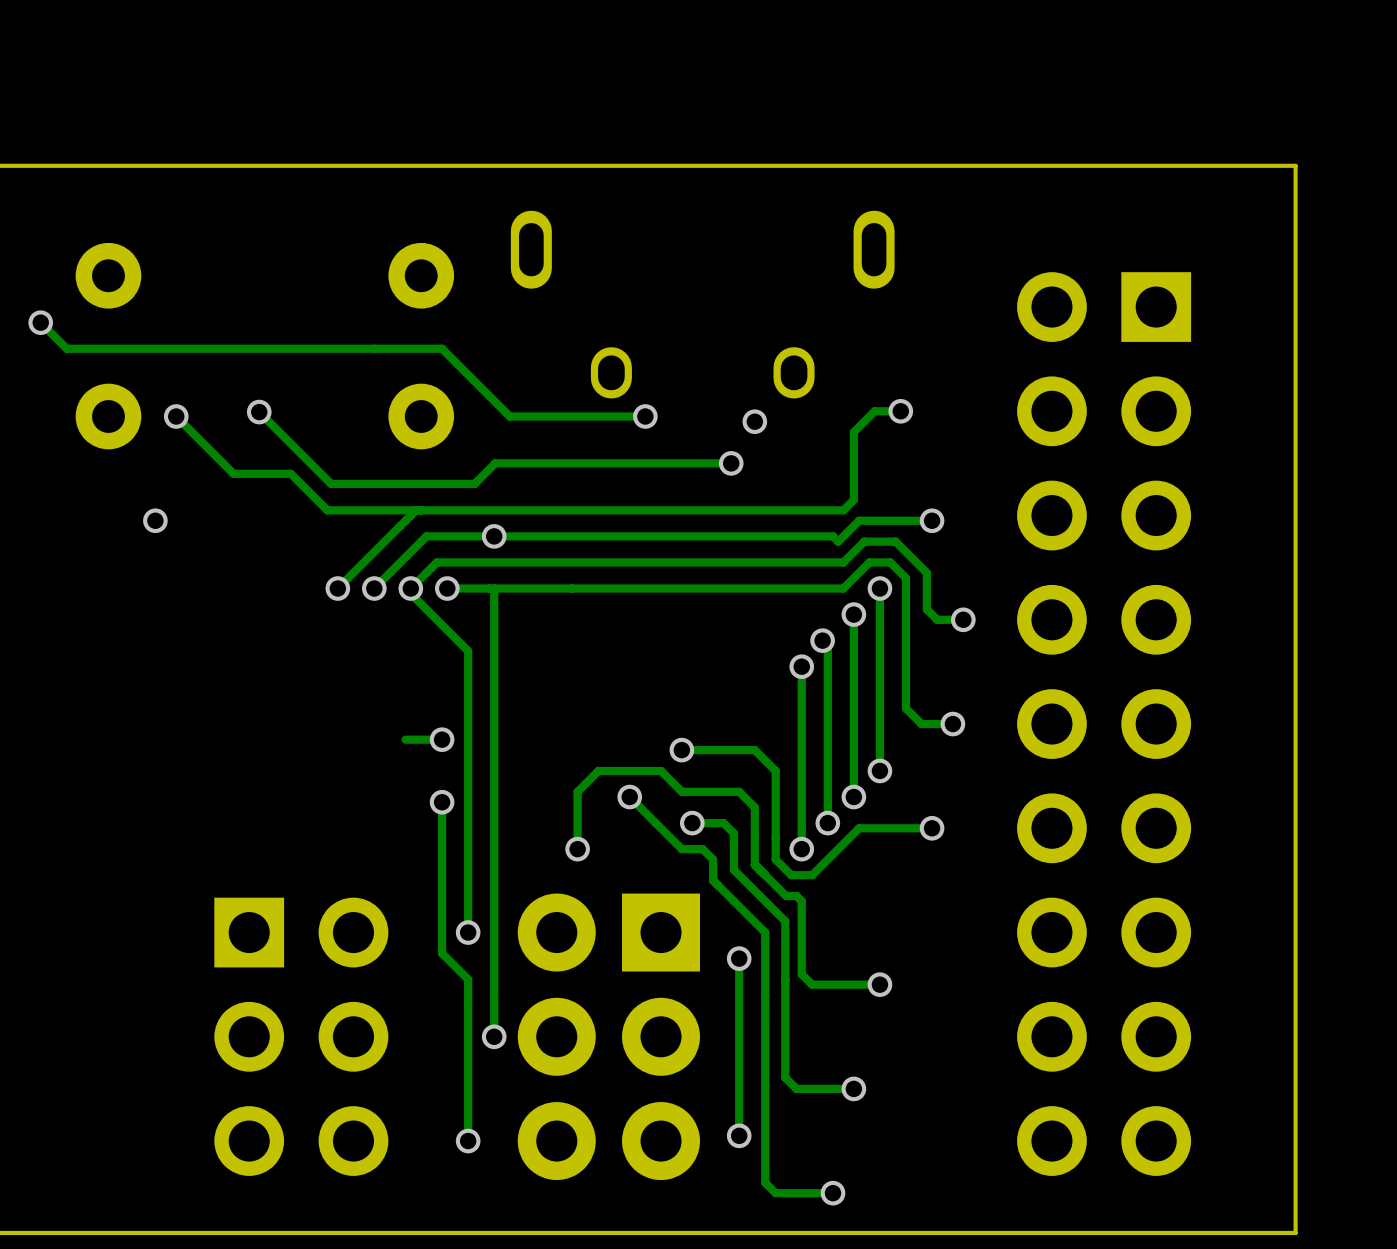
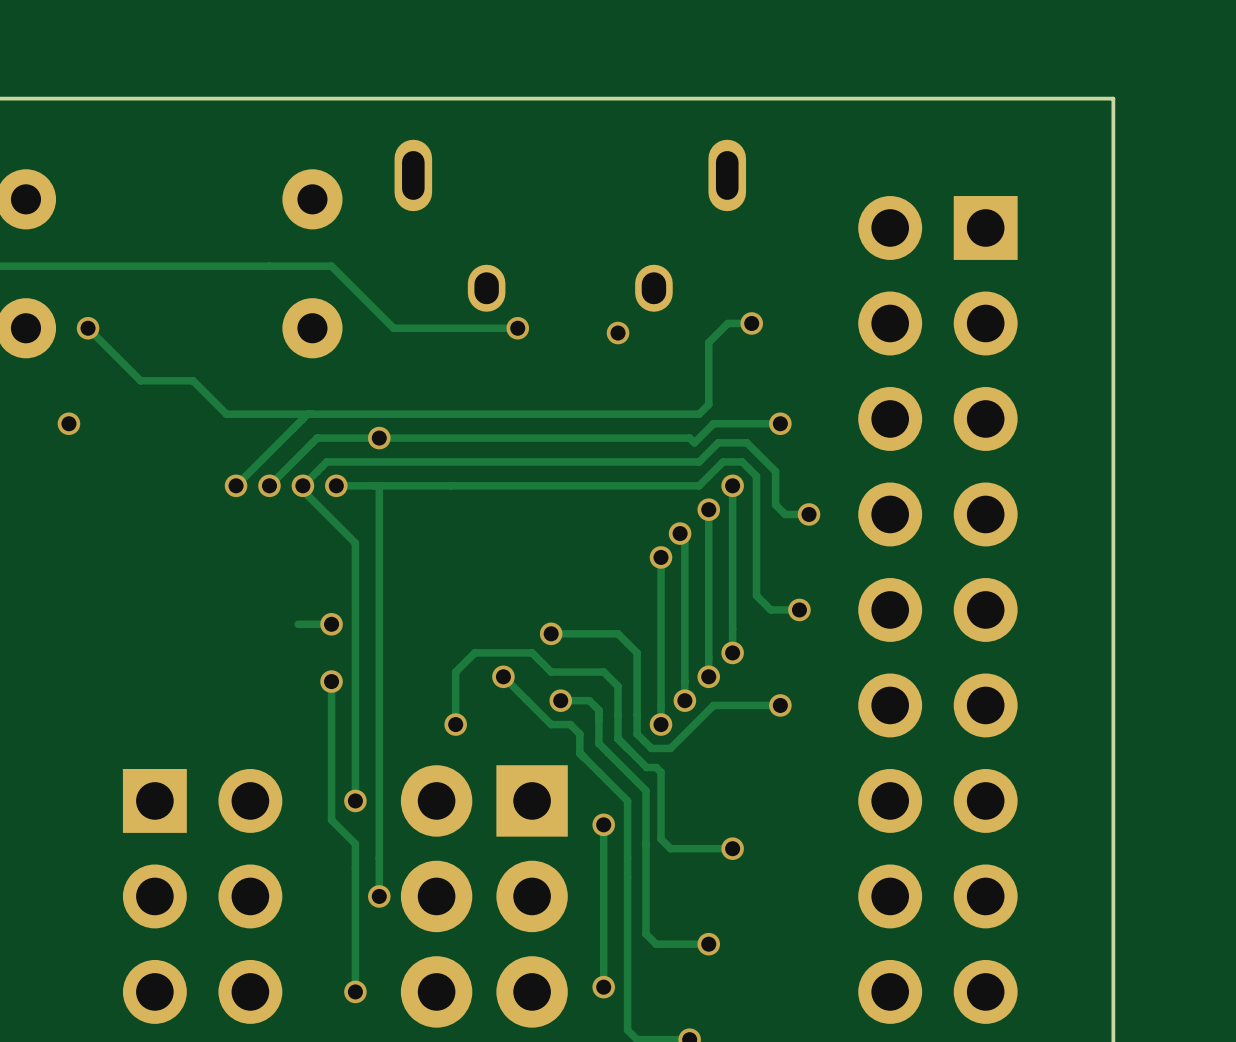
track: (259, 412) (331, 483) (474, 483) (495, 463) (731, 463) -> none
via: (259, 412) -> none
via: (731, 463) -> none

